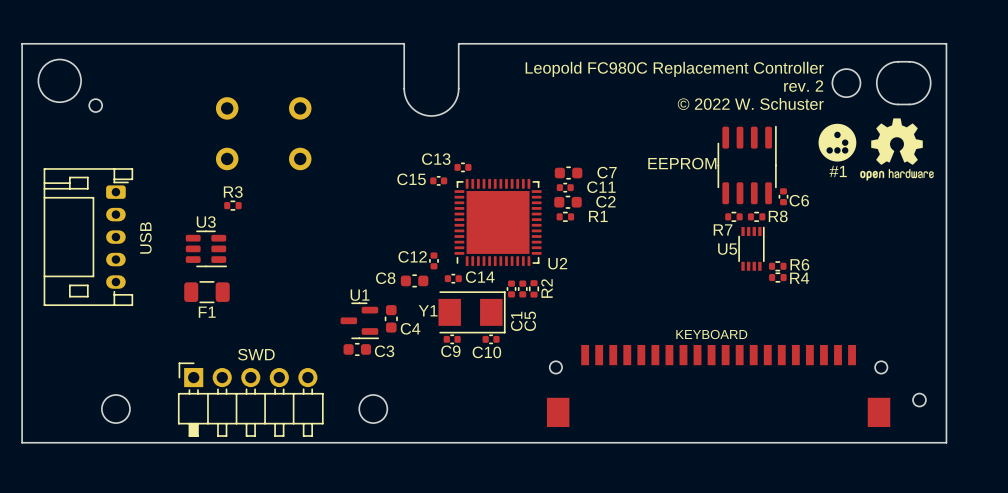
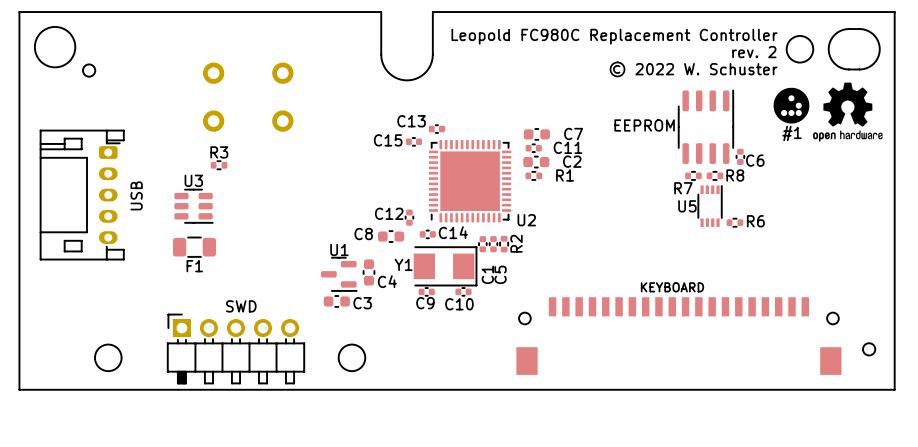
R4: (777, 277) -> none

